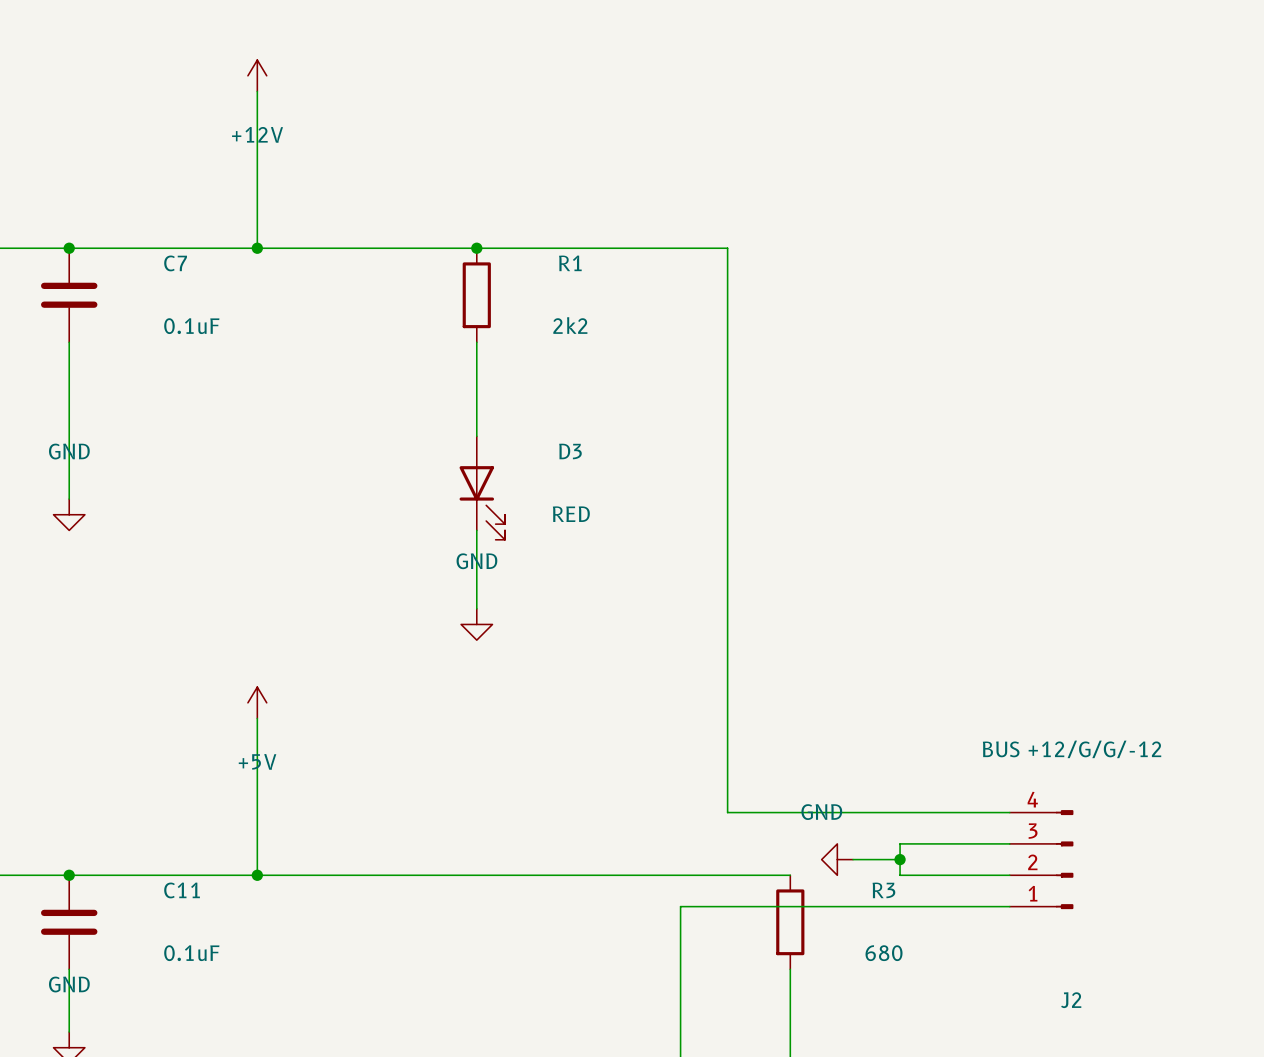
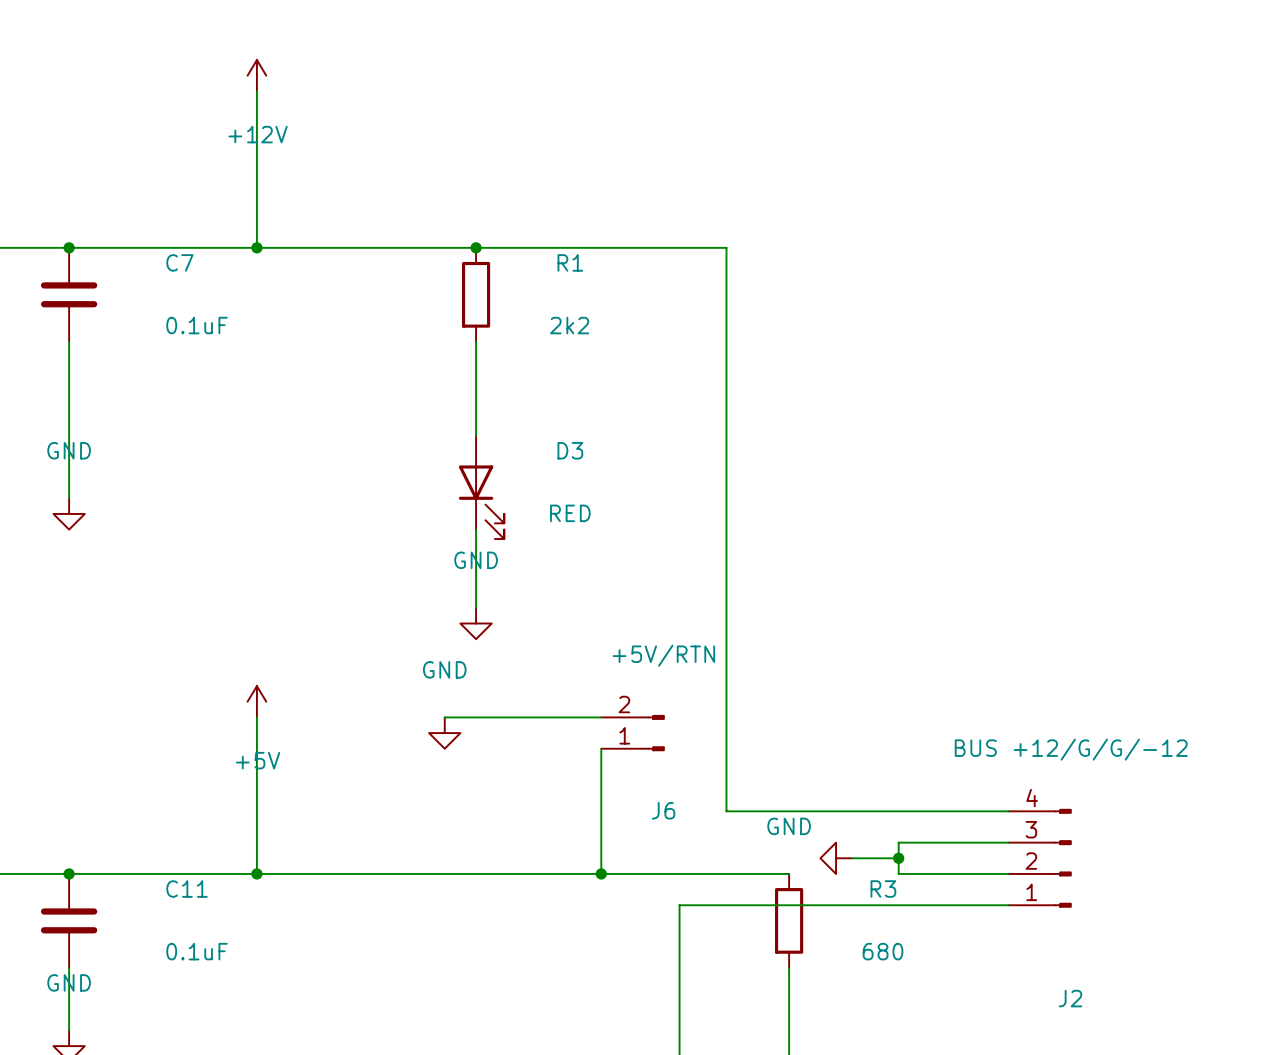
wire: none -> (444, 717) (601, 717)
power symbol: none -> GND (444, 733)
J6: none -> +5V/RTN (633, 733)
wire: none -> (601, 748) (601, 873)
power symbol text position: GND (821, 812) -> GND (789, 826)
junction: none -> (601, 873)

